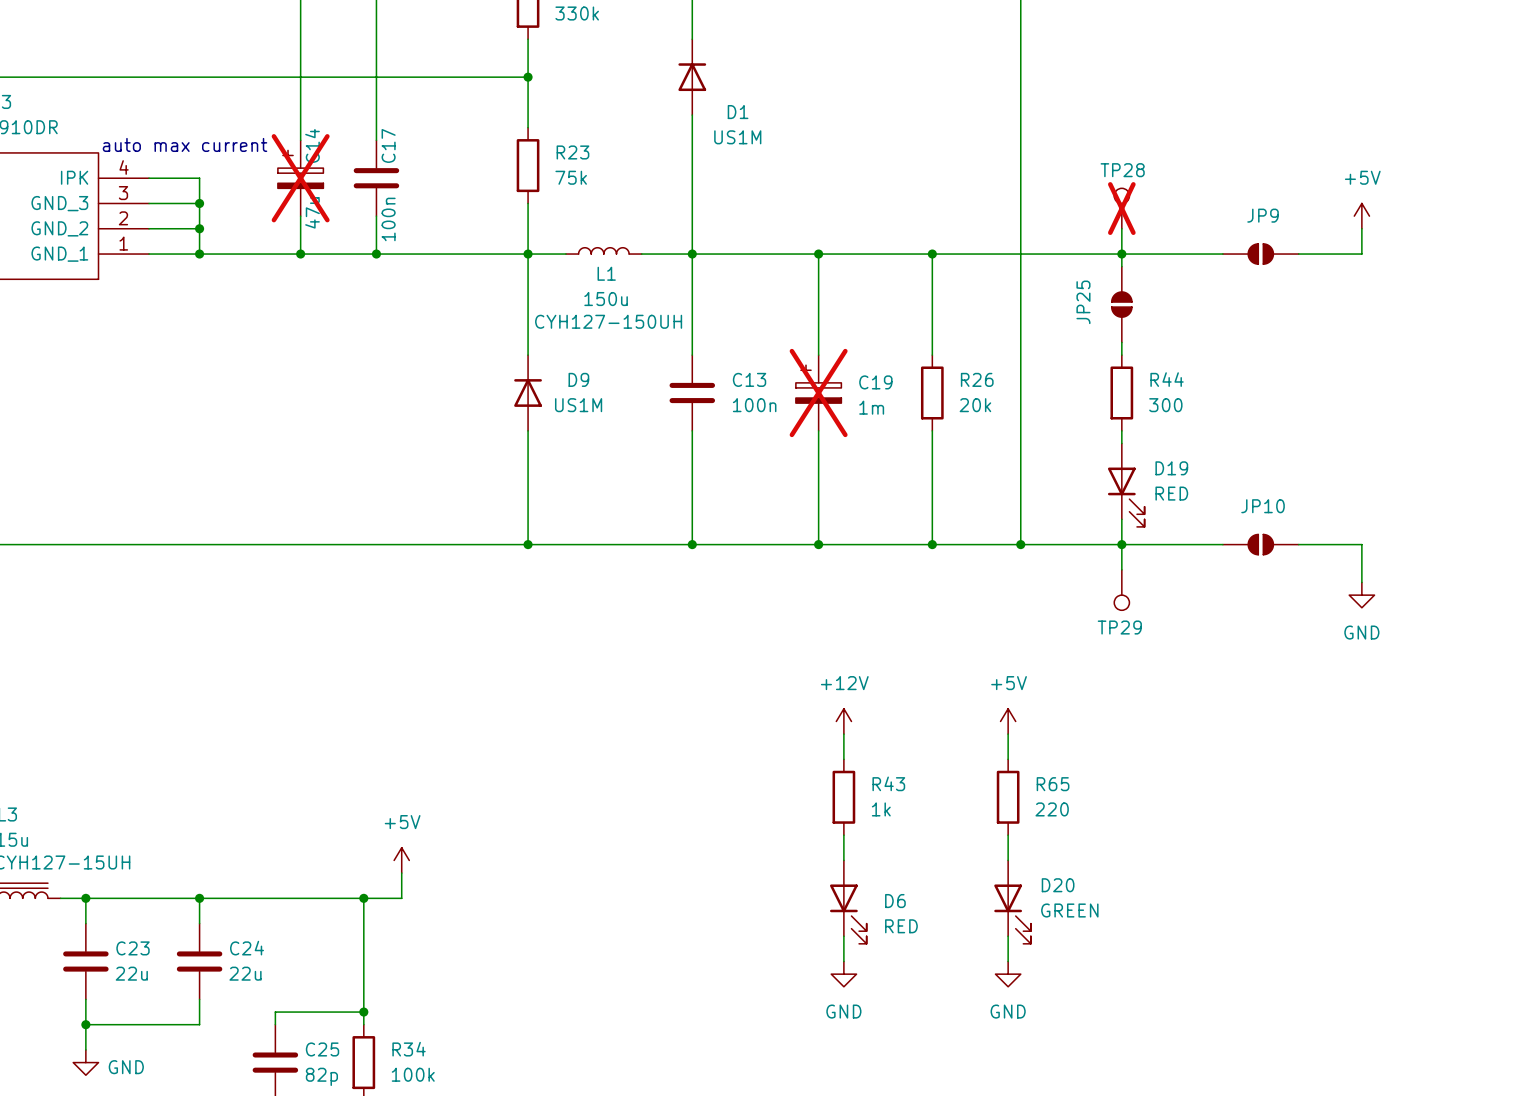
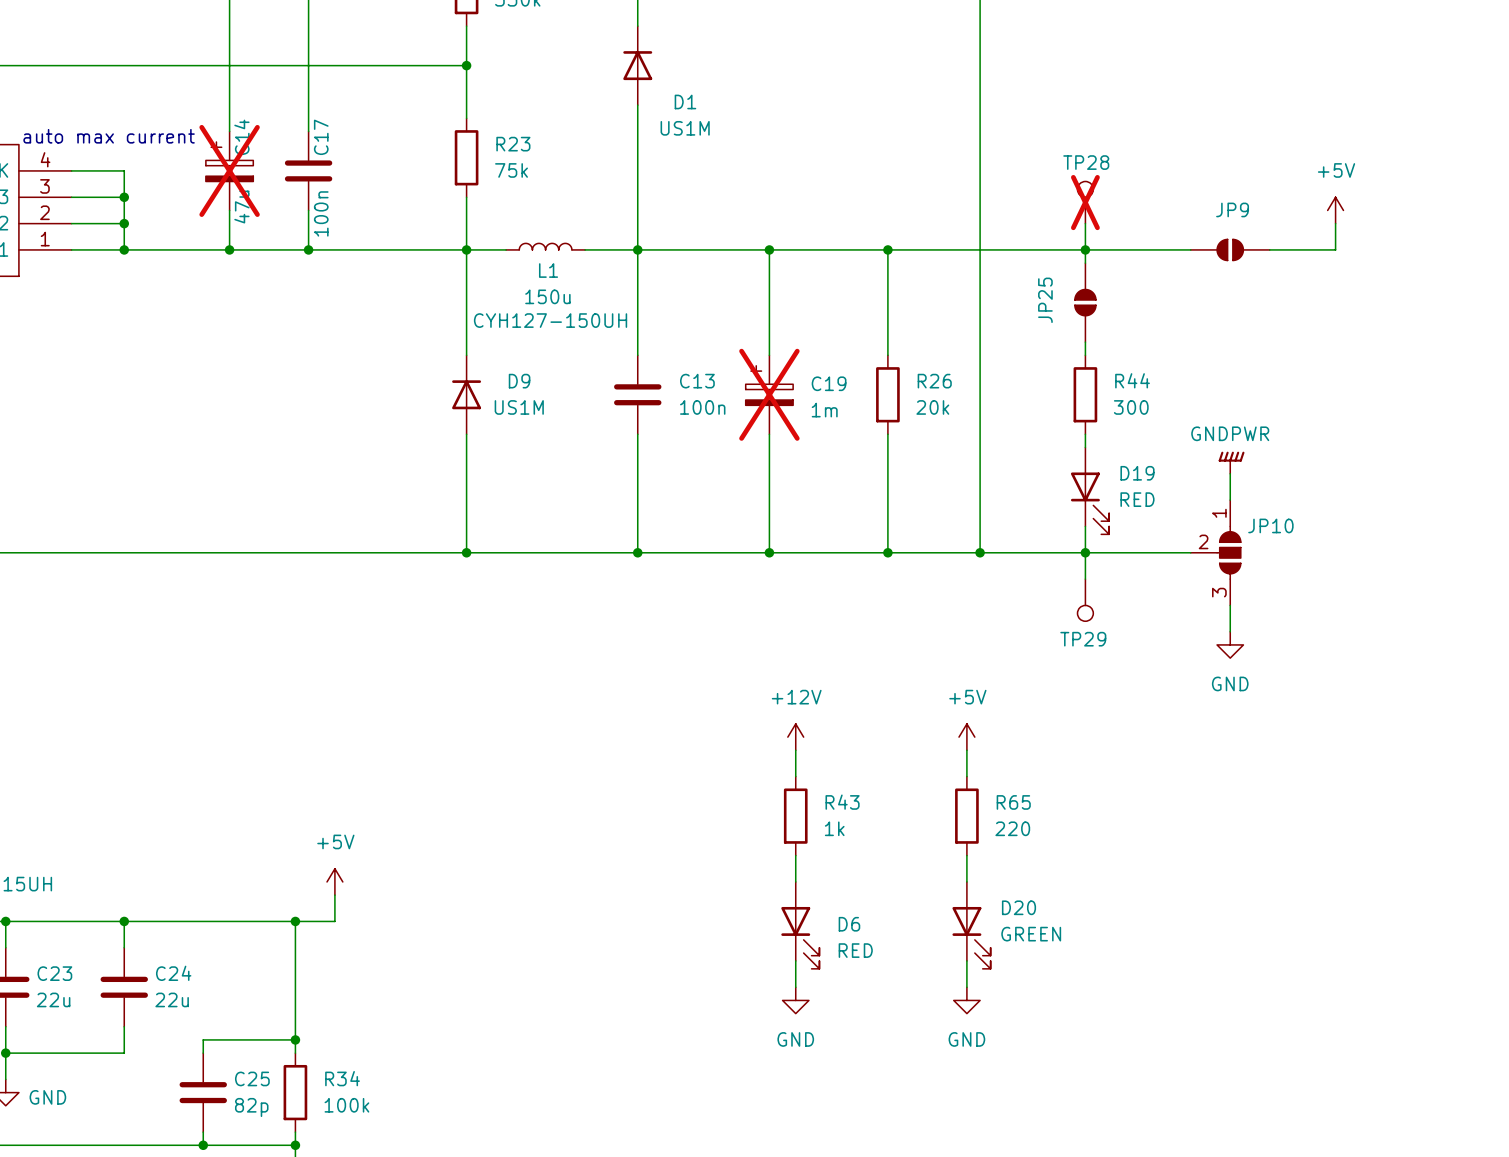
power symbol: none -> GNDPWR (1231, 462)
wire: none -> (1230, 473) (1230, 500)
JP10 name position: JP10 (1263, 506) -> JP10 (1270, 525)
JP10 symbol: [1222, 534, 1299, 555] -> [1190, 500, 1241, 606]
wire: (1298, 544) (1361, 544) (1361, 582) -> none
wire: none -> (1230, 605) (1230, 631)
power symbol position: GND (1361, 595) -> GND (1230, 644)

